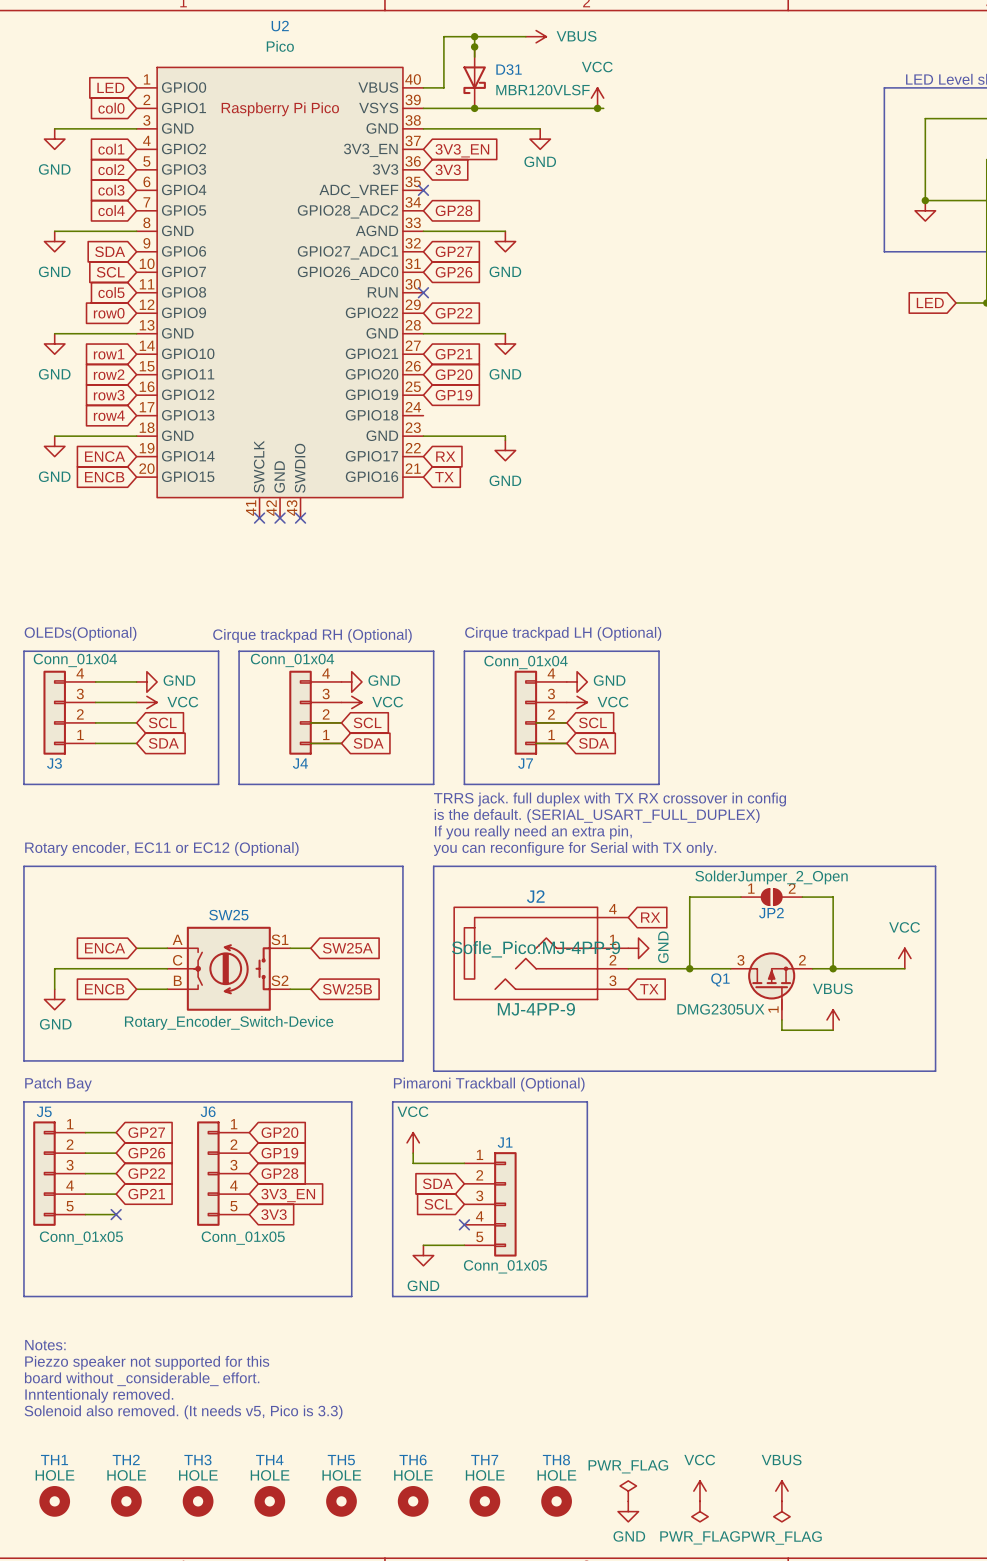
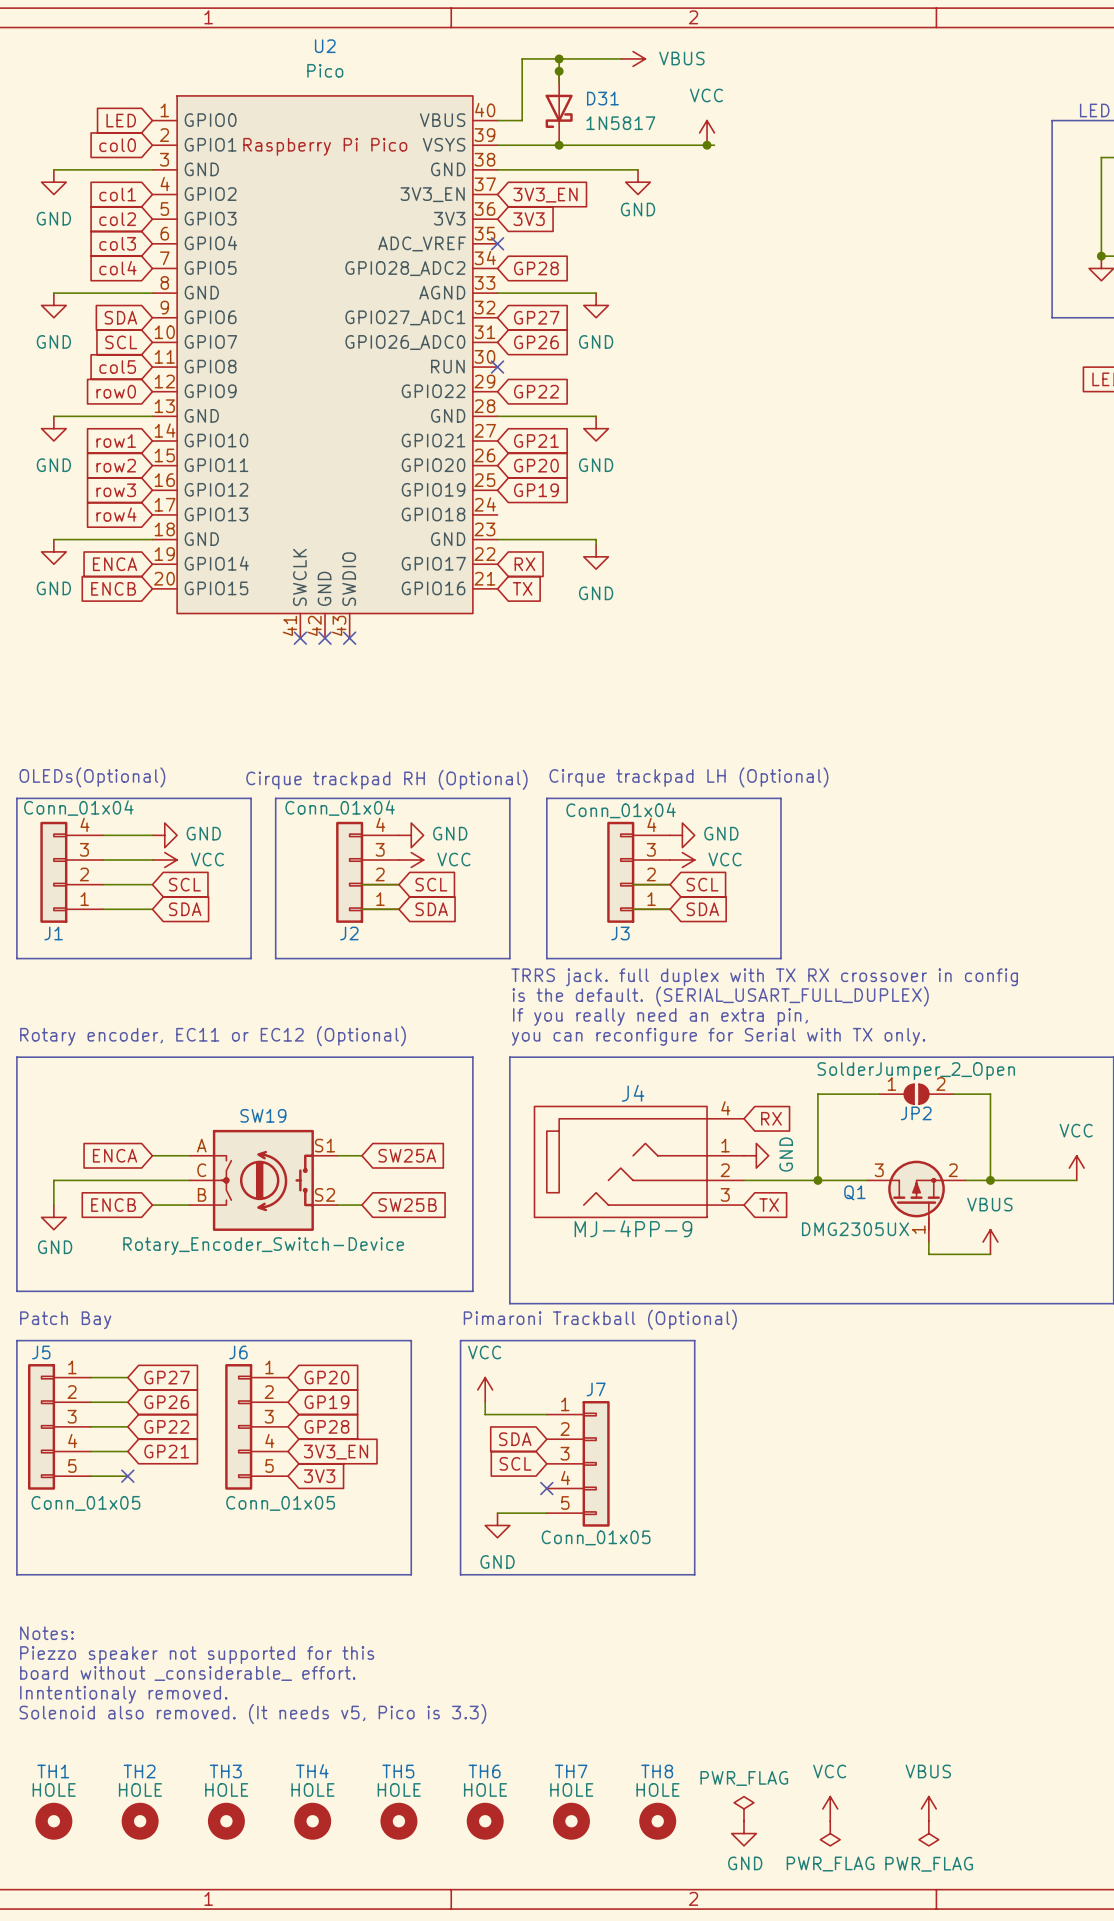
D31 value: MBR120VLSF (543, 90) -> 1N5817 (620, 123)
J3 name: J3 (54, 763) -> J1 (53, 933)
J4 name: J4 (300, 763) -> J2 (349, 933)
J7 name: J7 (525, 763) -> J3 (620, 933)
J2 name: J2 (535, 896) -> J4 (633, 1093)
SW25 name: SW25 (228, 915) -> SW19 (263, 1115)
J2 text: Sofle_Pico:MJ-4PP-9 (536, 949) -> none
J1 name: J1 (505, 1142) -> J7 (596, 1389)

